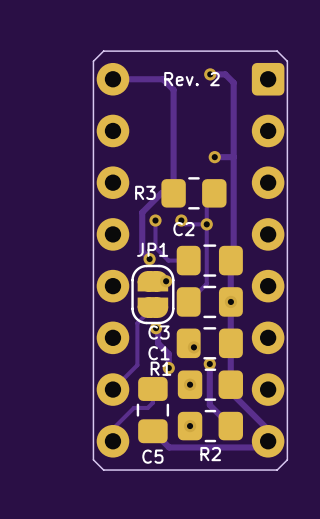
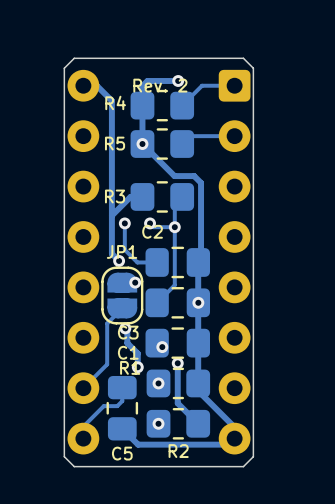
track: (210, 74) (225, 74) (233, 82) (233, 178) -> none
track: (126, 79) (162, 79) (173, 89) -> (178, 80) (147, 80) (142, 86) (142, 96)
track: none -> (96, 85) (111, 100) (111, 215)
track: none -> (234, 85) (202, 85) (182, 105)
R4: none -> (162, 105)
track: none -> (234, 136) (190, 136) (182, 144)
track: (173, 139) (173, 193) -> (142, 144) (174, 176) (194, 176) (201, 182)
R5: none -> (162, 144)
via position: (214, 157) -> (142, 144)
track: (233, 157) (214, 157) -> none

